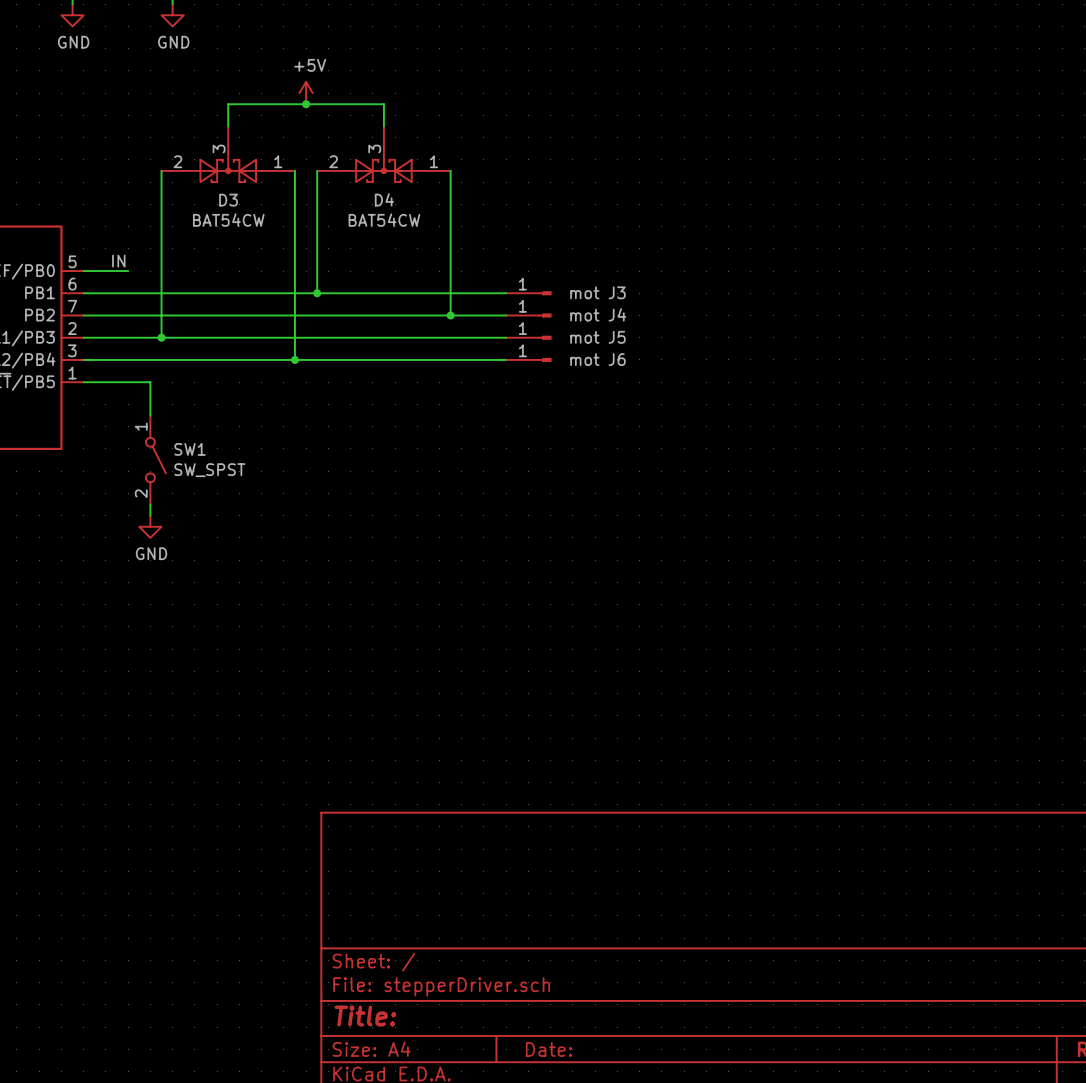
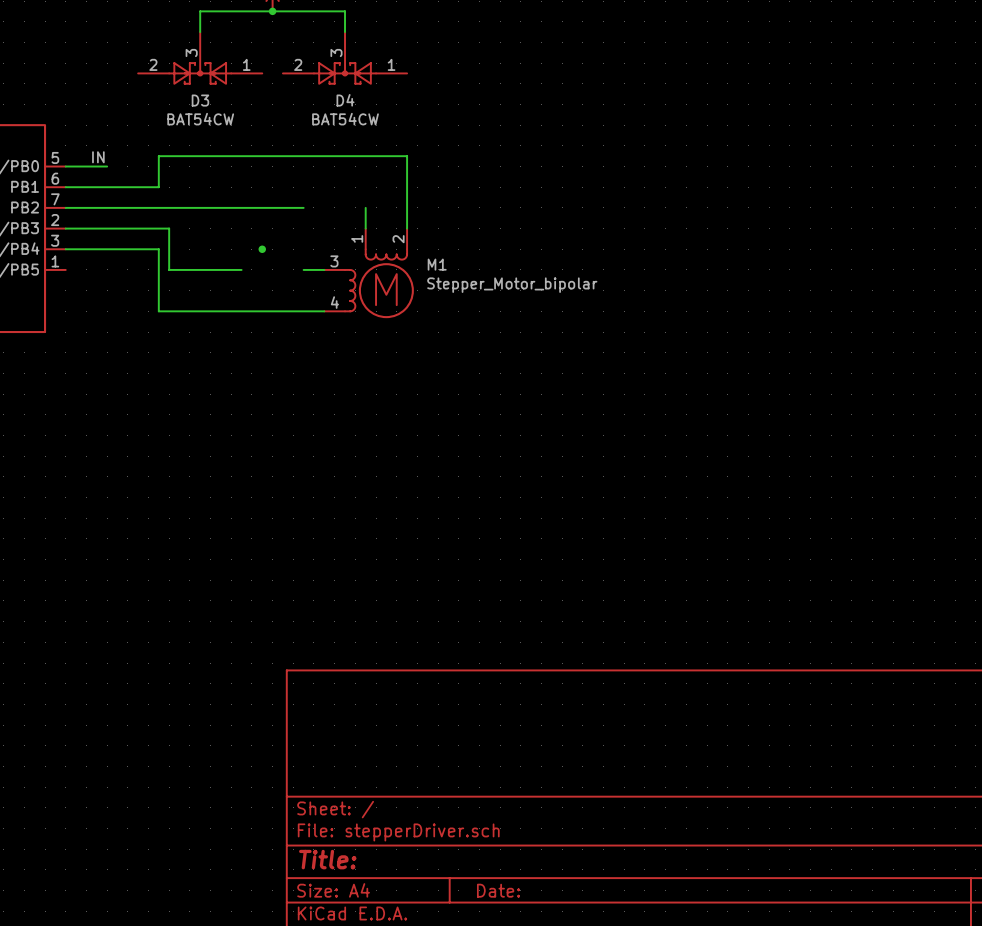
wire: (161, 170) (161, 337) -> none
wire: (294, 170) (294, 359) -> none
wire: (317, 170) (317, 293) -> none
wire: (450, 170) (450, 259) -> none
wire: (183, 293) (506, 293) -> (158, 187) (158, 156) (407, 156)
junction: (317, 293) -> none
J3: mot (528, 293) -> none
wire: (339, 315) (506, 315) -> none
wire: none -> (365, 207) (365, 228)
wire: none -> (407, 207) (407, 228)
junction: (450, 315) -> none
J4: mot (528, 315) -> none
junction: (161, 337) -> none
wire: (194, 337) (506, 337) -> (169, 228) (169, 269) (241, 269)
J5: mot (528, 337) -> none
wire: (183, 359) (506, 359) -> (158, 249) (158, 311) (324, 311)
J6: mot (528, 359) -> none
wire: (83, 382) (150, 382) (150, 415) -> none
wire: none -> (303, 269) (324, 269)
M1: none -> Stepper_Motor_bipolar (369, 273)
SW1: SW_SPST (155, 460) -> none
wire: (150, 504) (150, 515) -> none
power symbol: GND (150, 526) -> none

